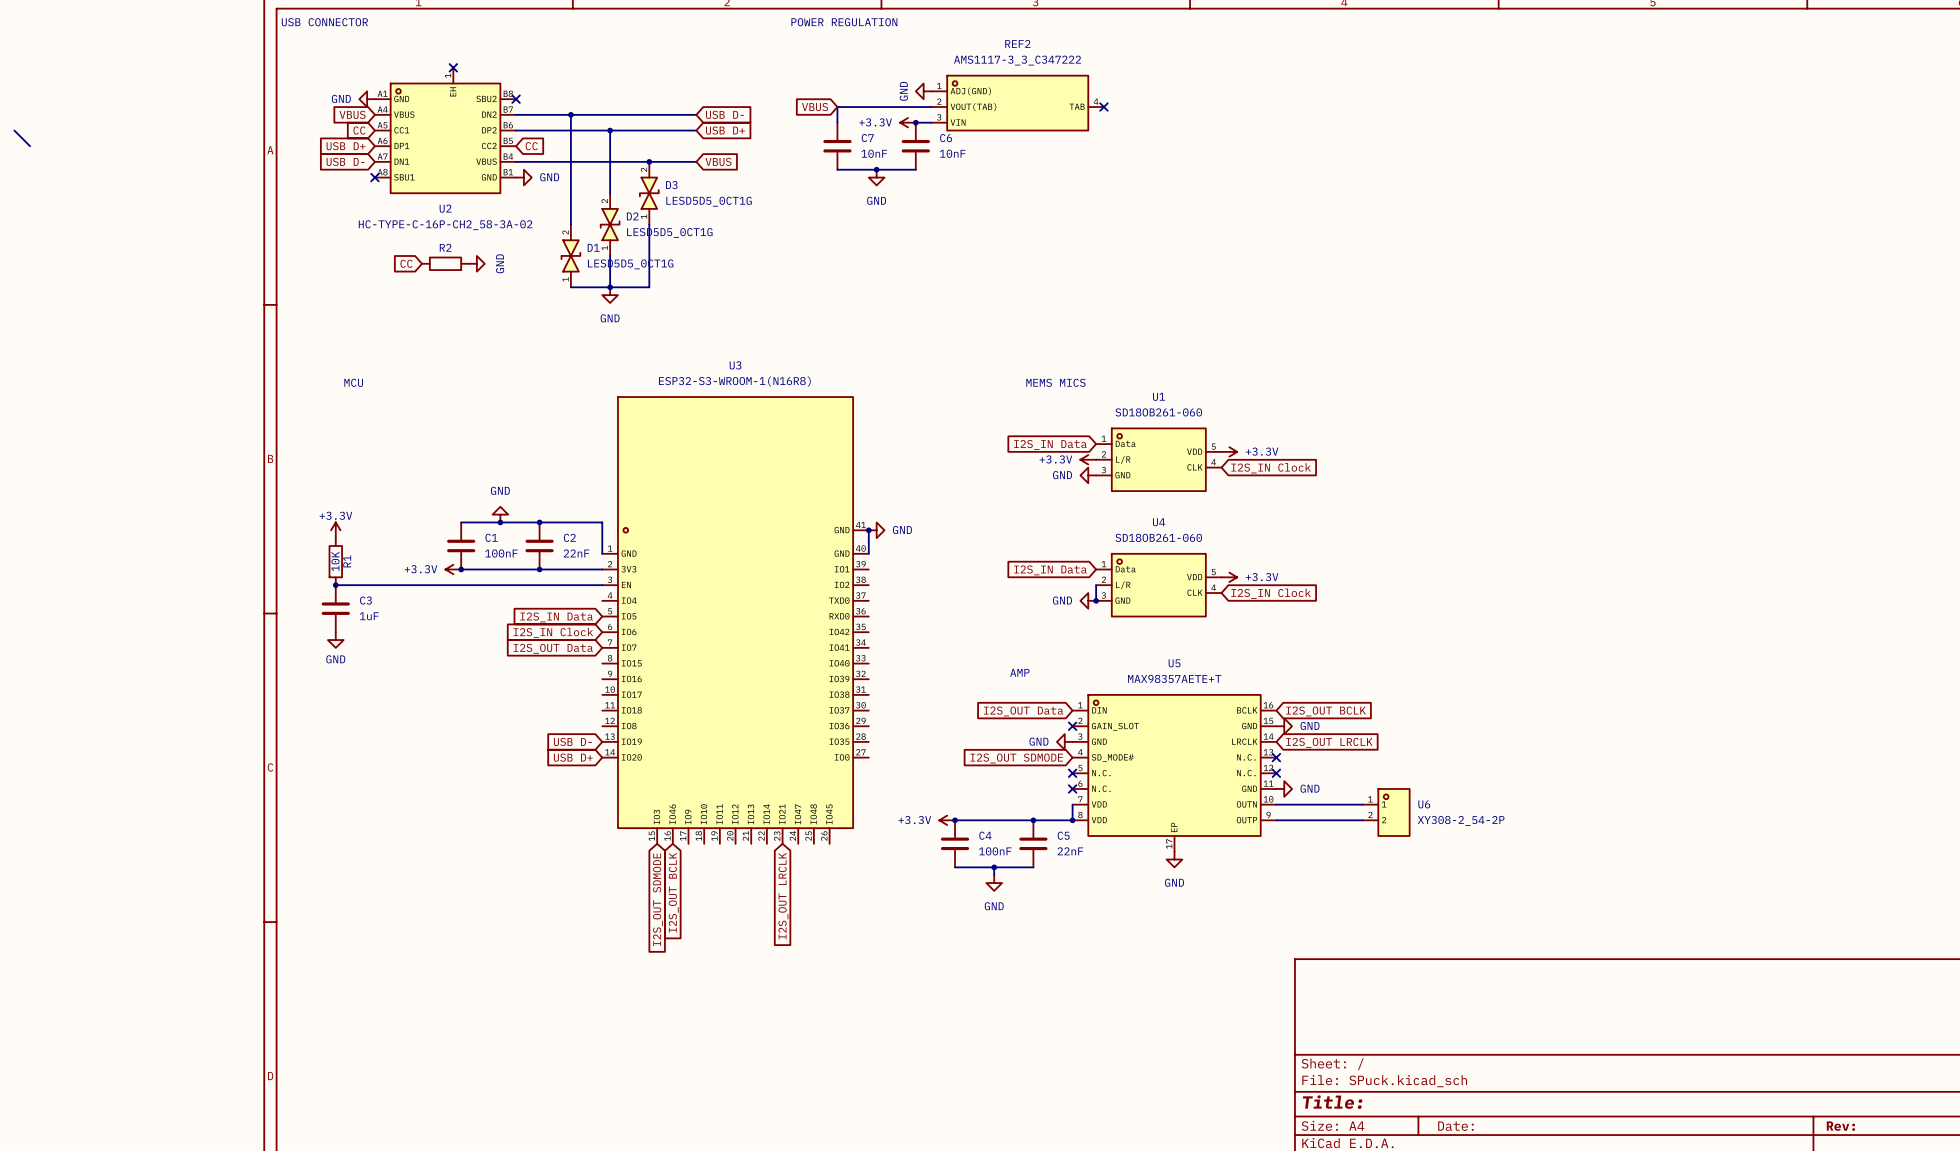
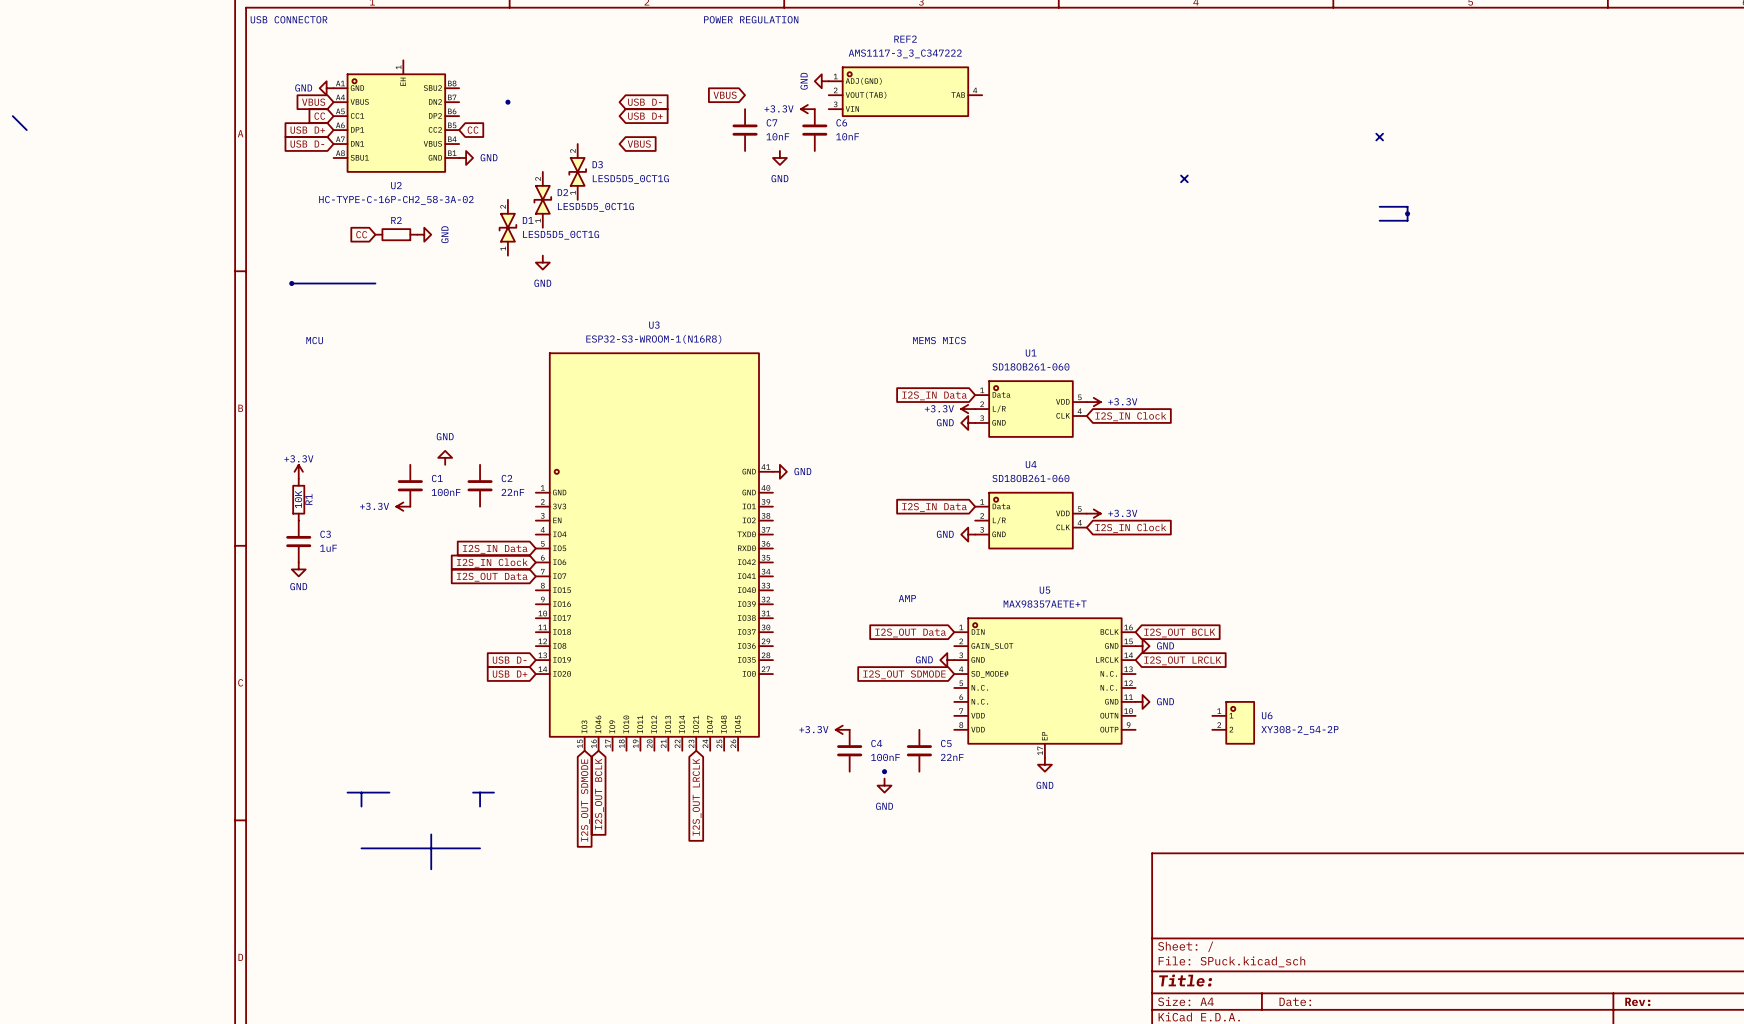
no-connect mark: (453, 67) -> none
no-connect mark: (516, 99) -> none
wire: (931, 107) (837, 107) (837, 122) -> none
no-connect mark: (1103, 107) -> none
wire: (516, 114) (696, 114) -> none
wire: (570, 114) (570, 224) -> none
wire: (915, 122) (931, 122) -> none
junction: (915, 122) -> none
wire: (516, 130) (696, 130) -> none
wire: (610, 130) (610, 193) -> none
junction: (610, 130) -> none
no-connect mark: none -> (1379, 137)
wire: (516, 161) (696, 161) -> none
junction: (649, 161) -> none
wire: (837, 169) (915, 169) -> none
junction: (876, 169) -> none
no-connect mark: (374, 177) -> none
no-connect mark: none -> (1184, 178)
wire: (649, 224) (649, 287) (570, 287) -> none
wire: none -> (1379, 206) (1407, 206) (1407, 220) (1379, 220)
junction: none -> (1407, 213)
wire: (610, 255) (610, 287) -> none
junction: (610, 287) -> none
wire: none -> (291, 283) (375, 283)
junction: none -> (291, 283)
wire: (461, 522) (602, 522) (602, 553) -> none
junction: (500, 522) -> none
junction: (539, 522) -> none
wire: (868, 530) (868, 553) -> none
junction: (868, 530) -> none
wire: (461, 569) (602, 569) -> none
junction: (461, 569) -> none
junction: (539, 569) -> none
wire: (335, 585) (602, 585) -> none
junction: (335, 585) -> none
wire: (1096, 585) (1096, 600) -> none
junction: (1096, 600) -> none
no-connect mark: (1072, 726) -> none
no-connect mark: (1276, 757) -> none
no-connect mark: (1072, 773) -> none
no-connect mark: (1276, 773) -> none
no-connect mark: (1072, 788) -> none
wire: (1072, 804) (1072, 820) (955, 820) -> none
wire: (1276, 804) (1362, 804) -> none
junction: (955, 820) -> none
junction: (1033, 820) -> none
junction: (1072, 820) -> none
wire: (1276, 820) (1362, 820) -> none
wire: (955, 867) (1033, 867) -> none
wire: (994, 867) (994, 875) -> none
wire: none -> (347, 792) (389, 792)
wire: none -> (361, 792) (361, 806)
wire: none -> (473, 792) (493, 792)
wire: none -> (480, 792) (480, 806)
wire: none -> (431, 834) (431, 869)
wire: none -> (361, 848) (480, 848)

